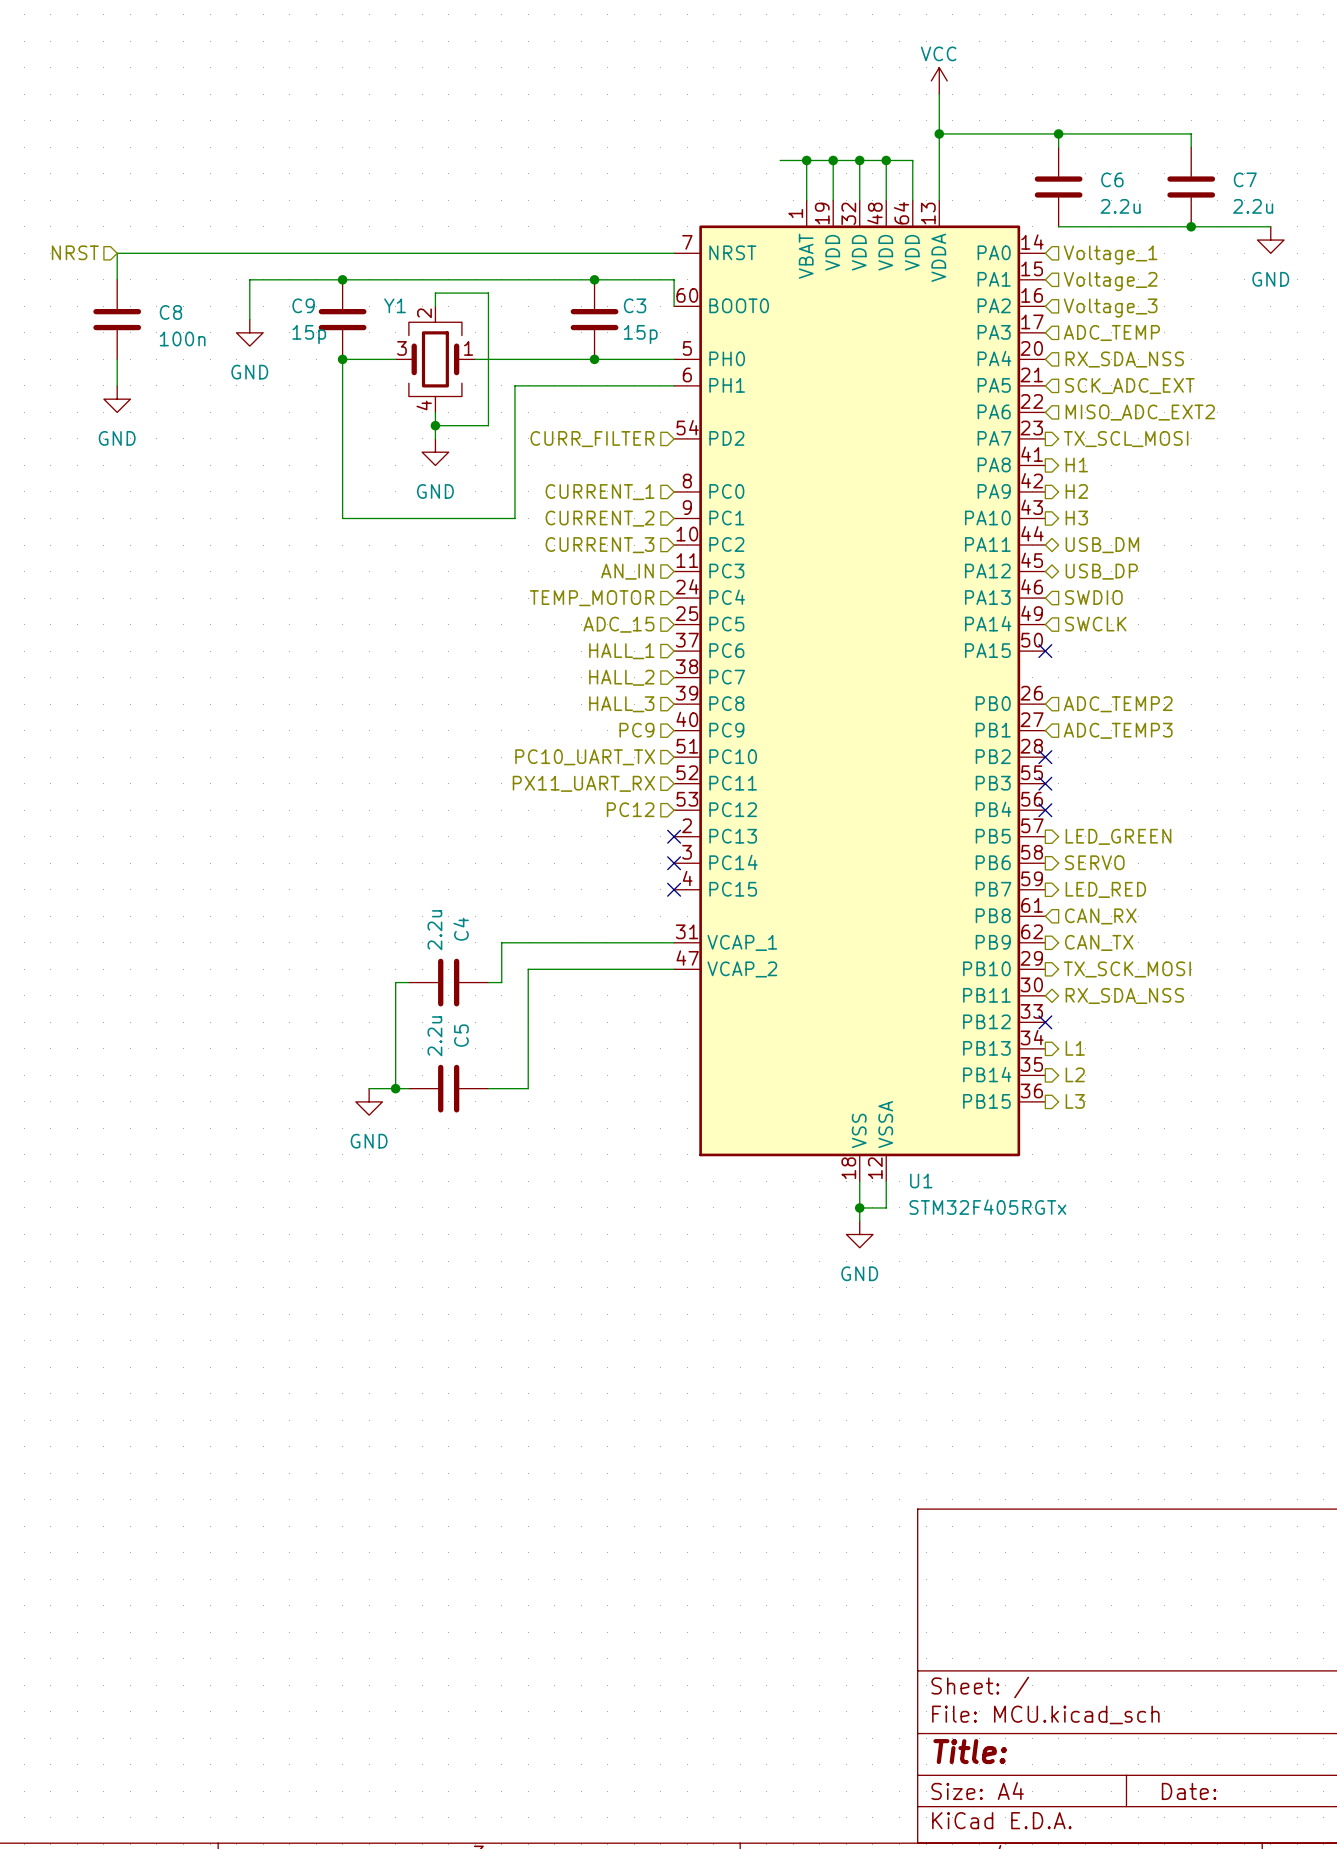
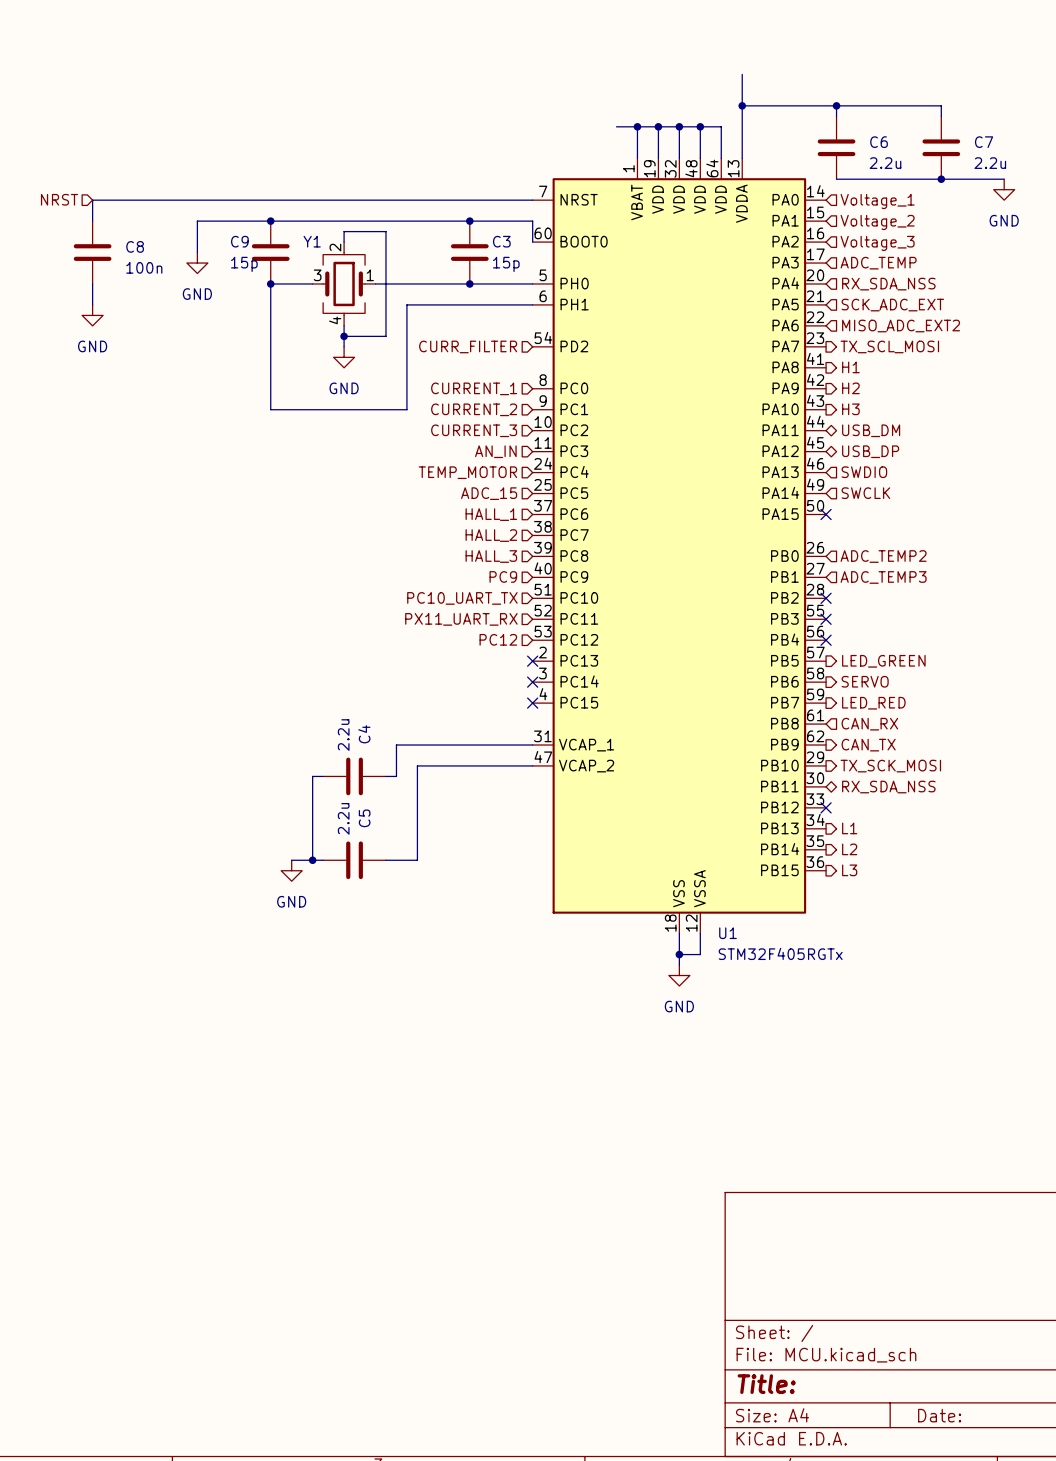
power symbol: VCC (939, 80) -> none

